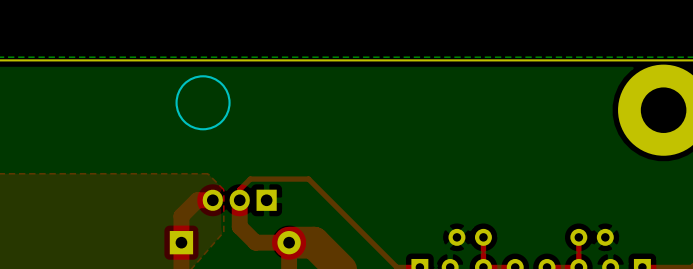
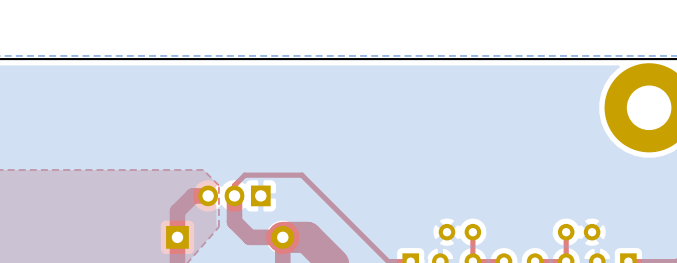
drawing: [175, 75, 231, 131] -> none

